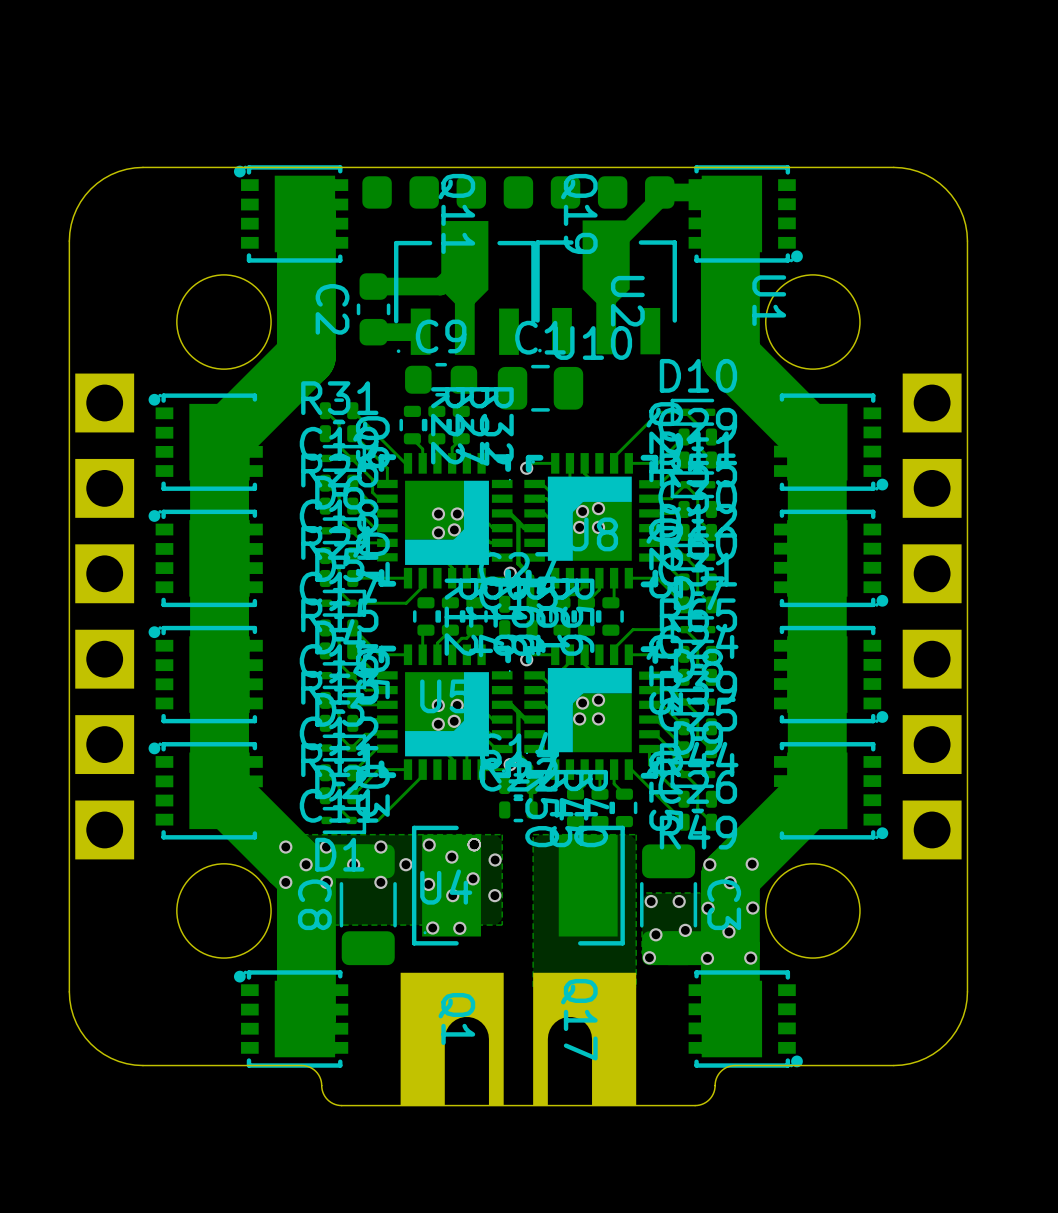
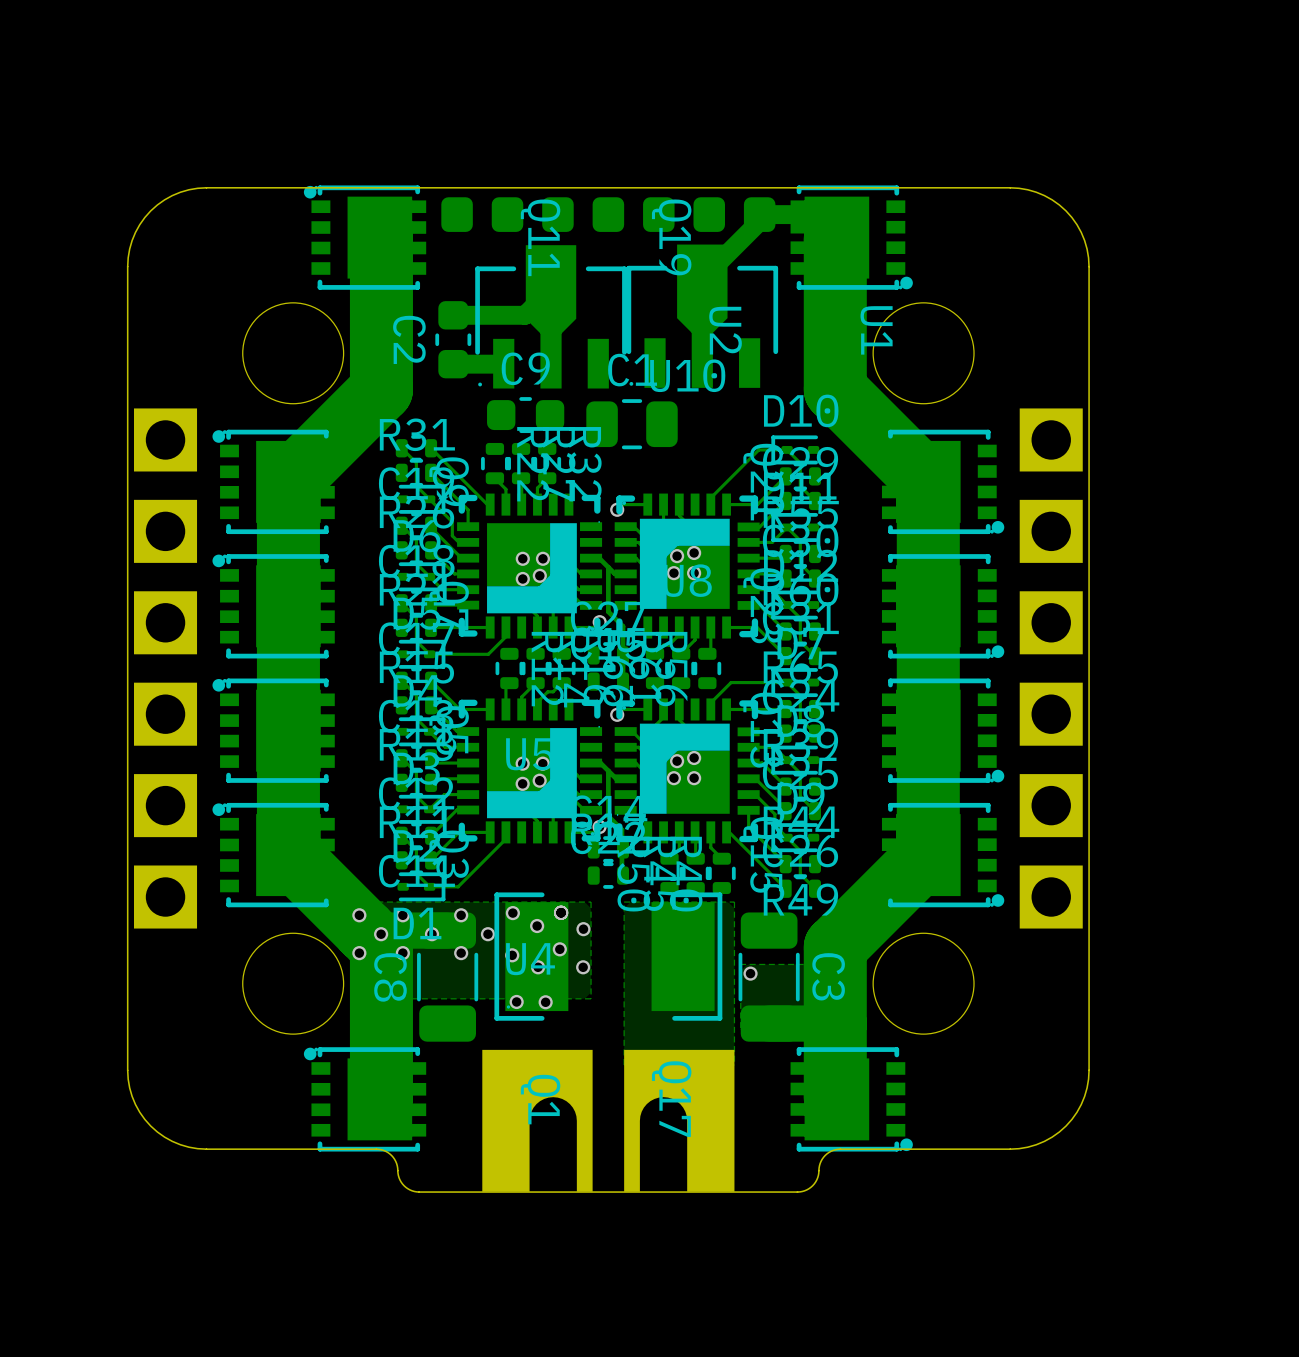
via: (709, 864) -> none
via: (752, 864) -> none
via: (730, 882) -> none
via: (679, 901) -> none
via: (752, 907) -> none
via: (708, 908) -> none
via: (685, 930) -> none
via: (728, 931) -> none
via: (655, 934) -> none
via: (649, 957) -> none
via: (707, 958) -> none
via: (750, 958) -> none

